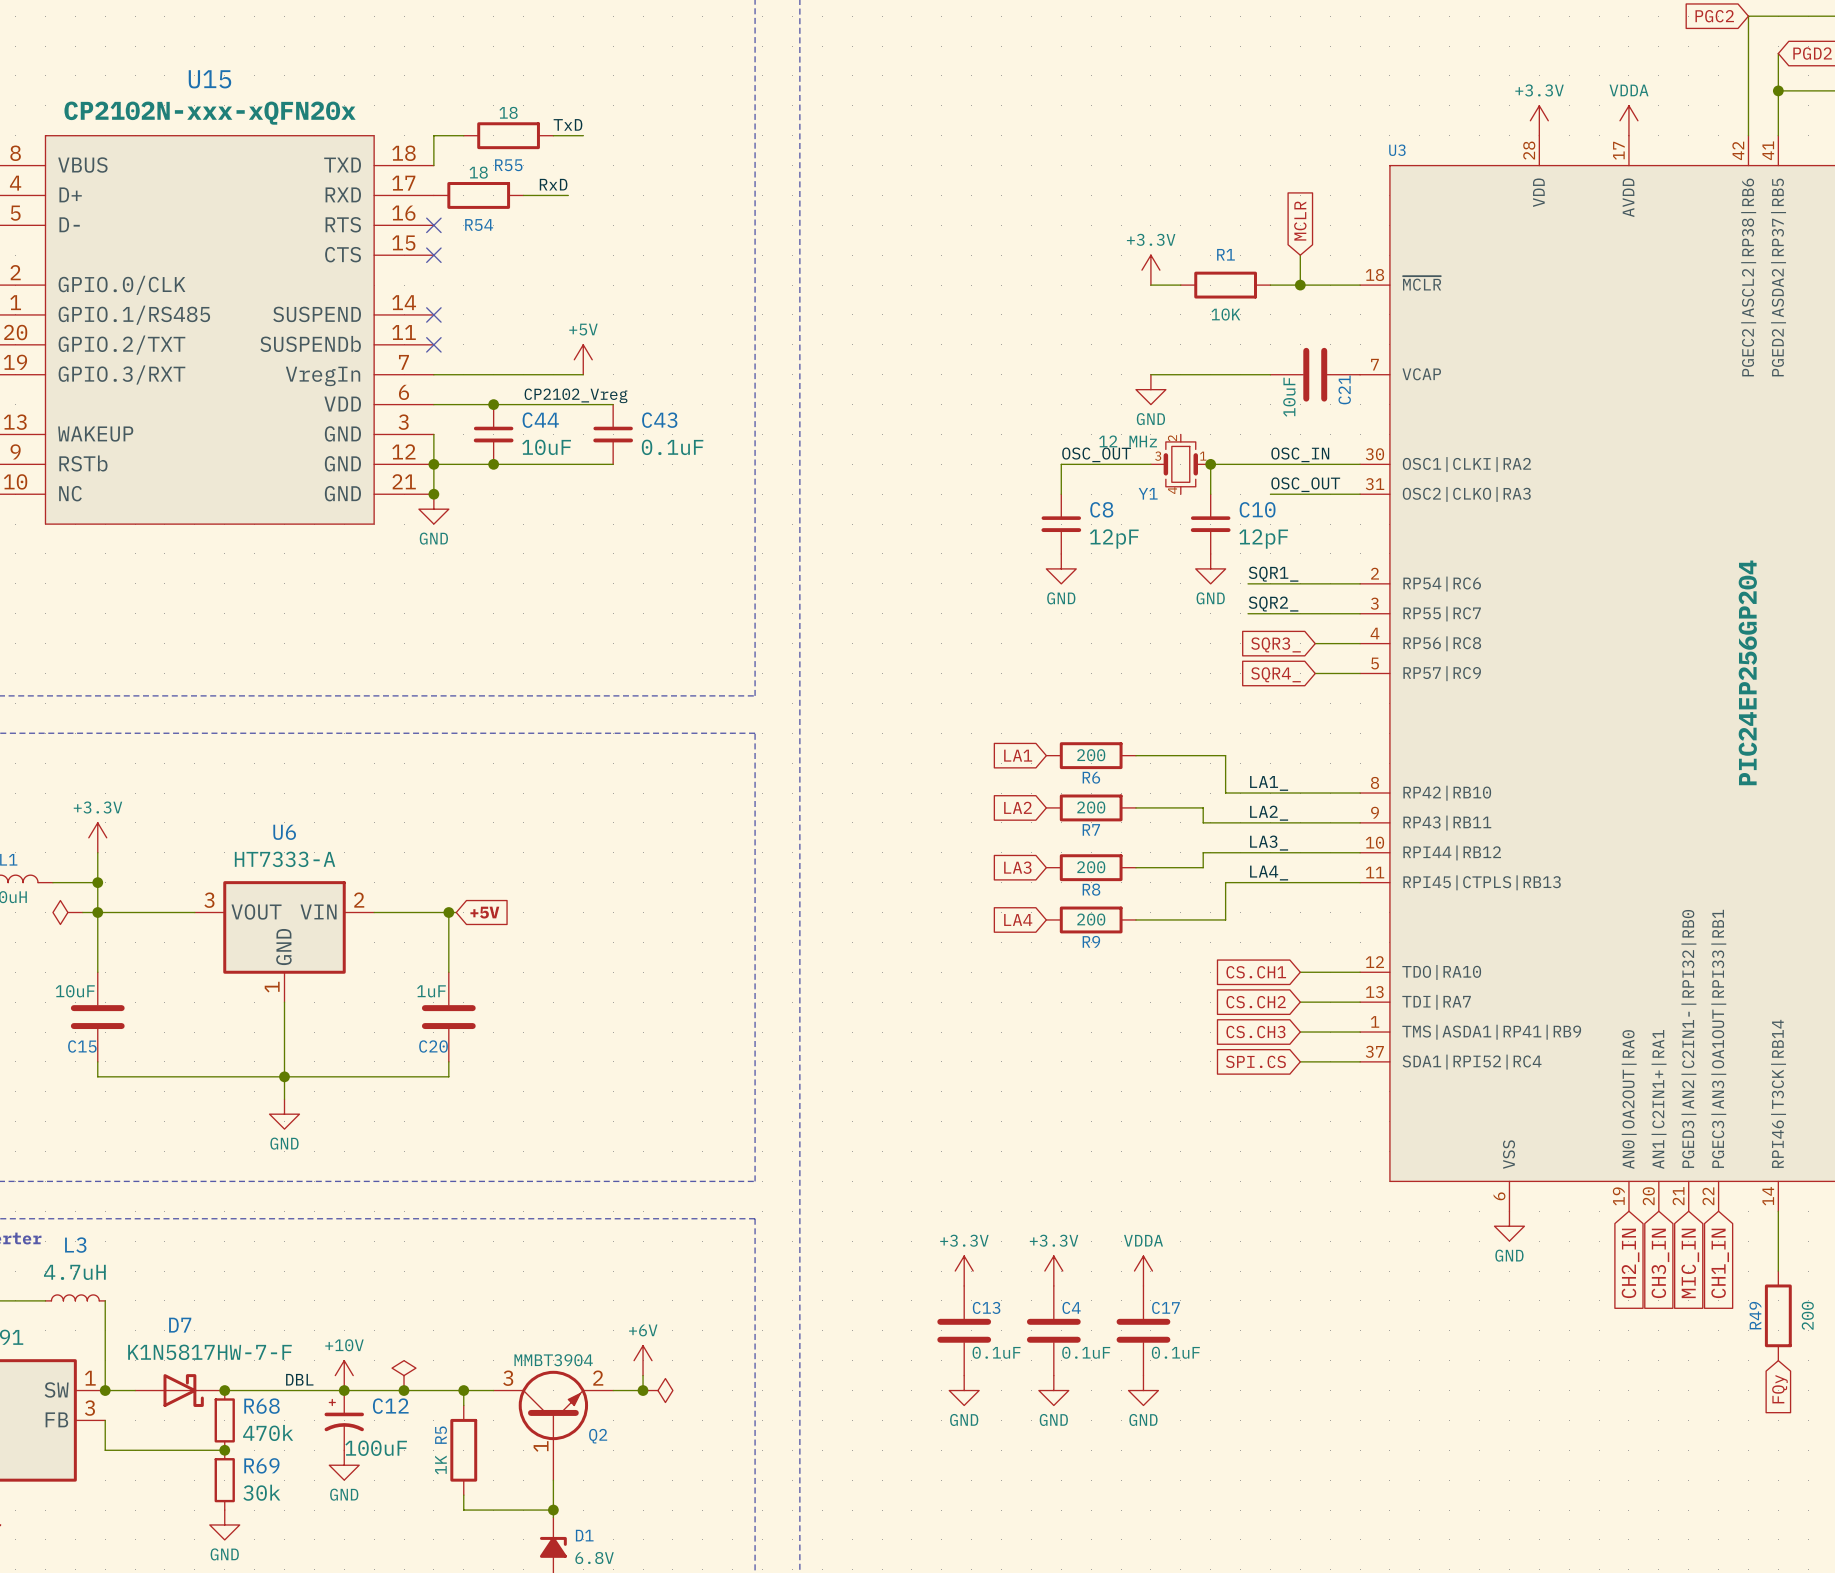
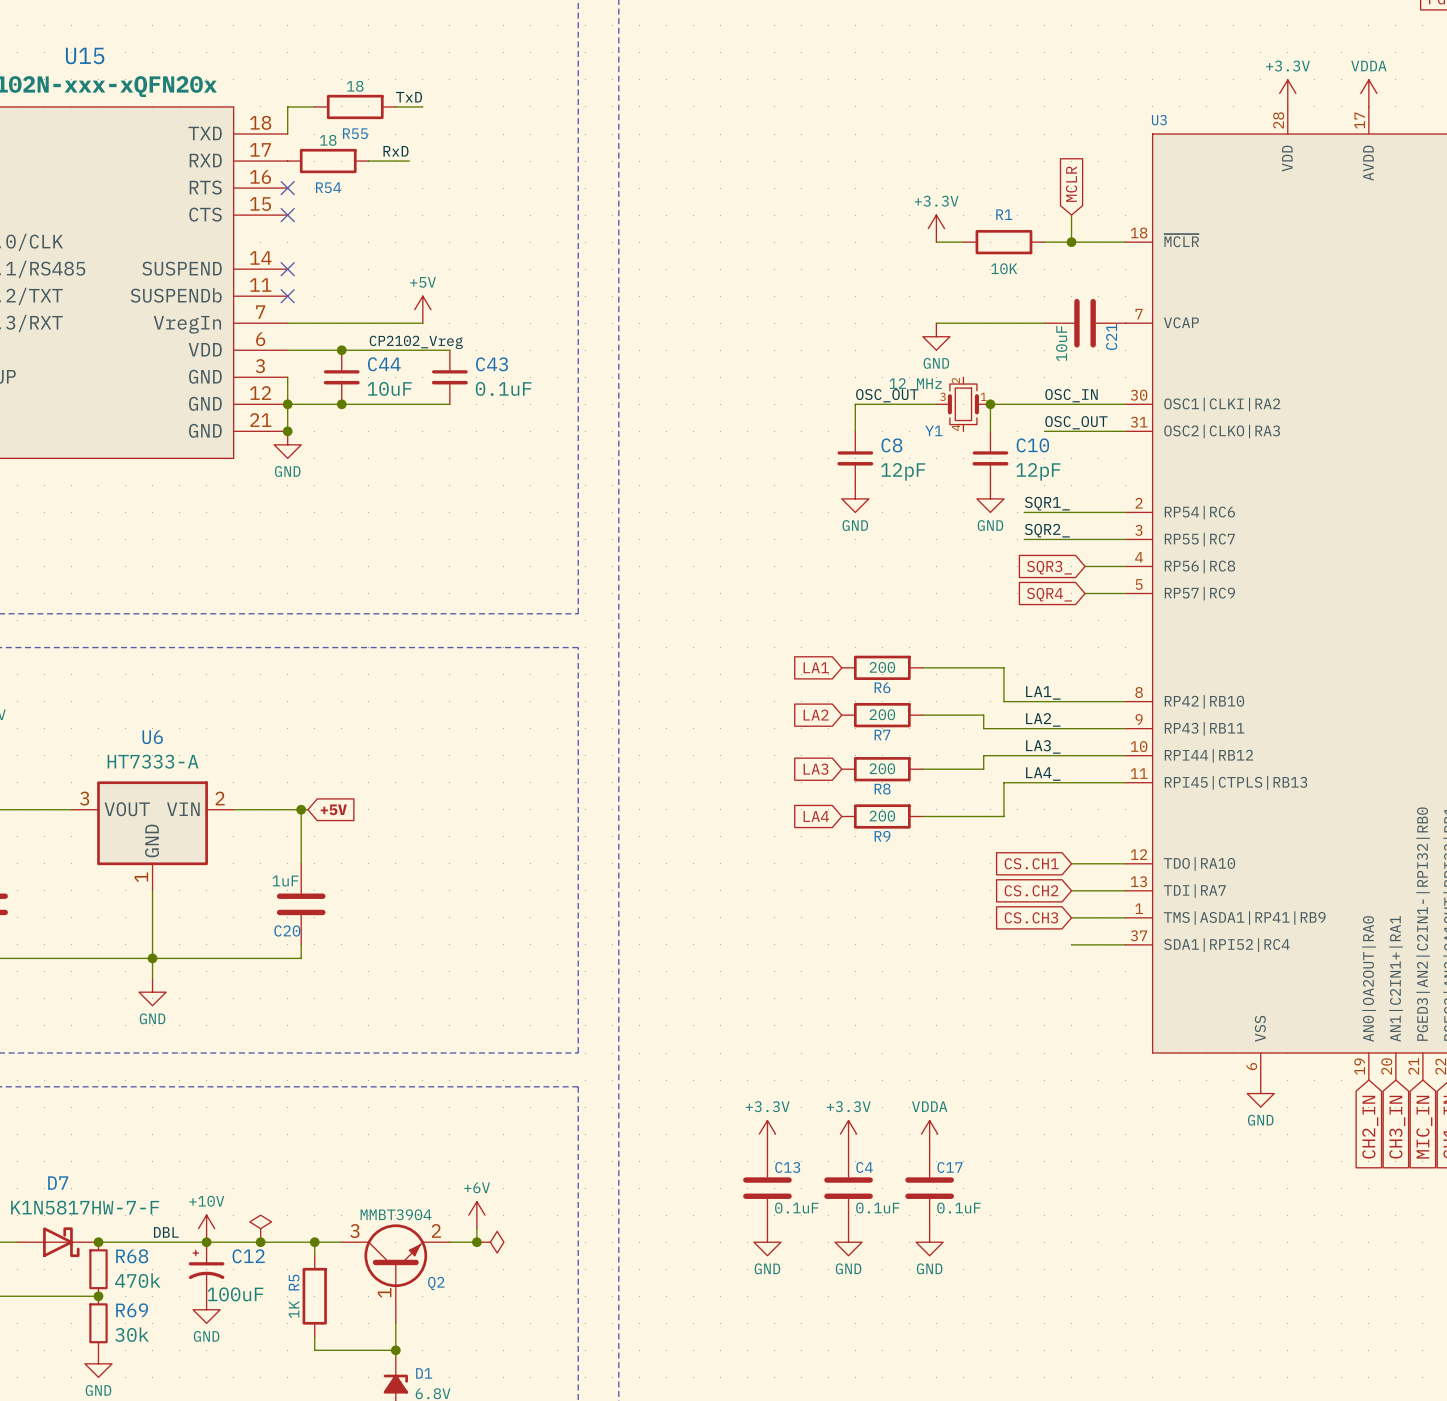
global label: SPI.CS (1255, 1061) -> none

